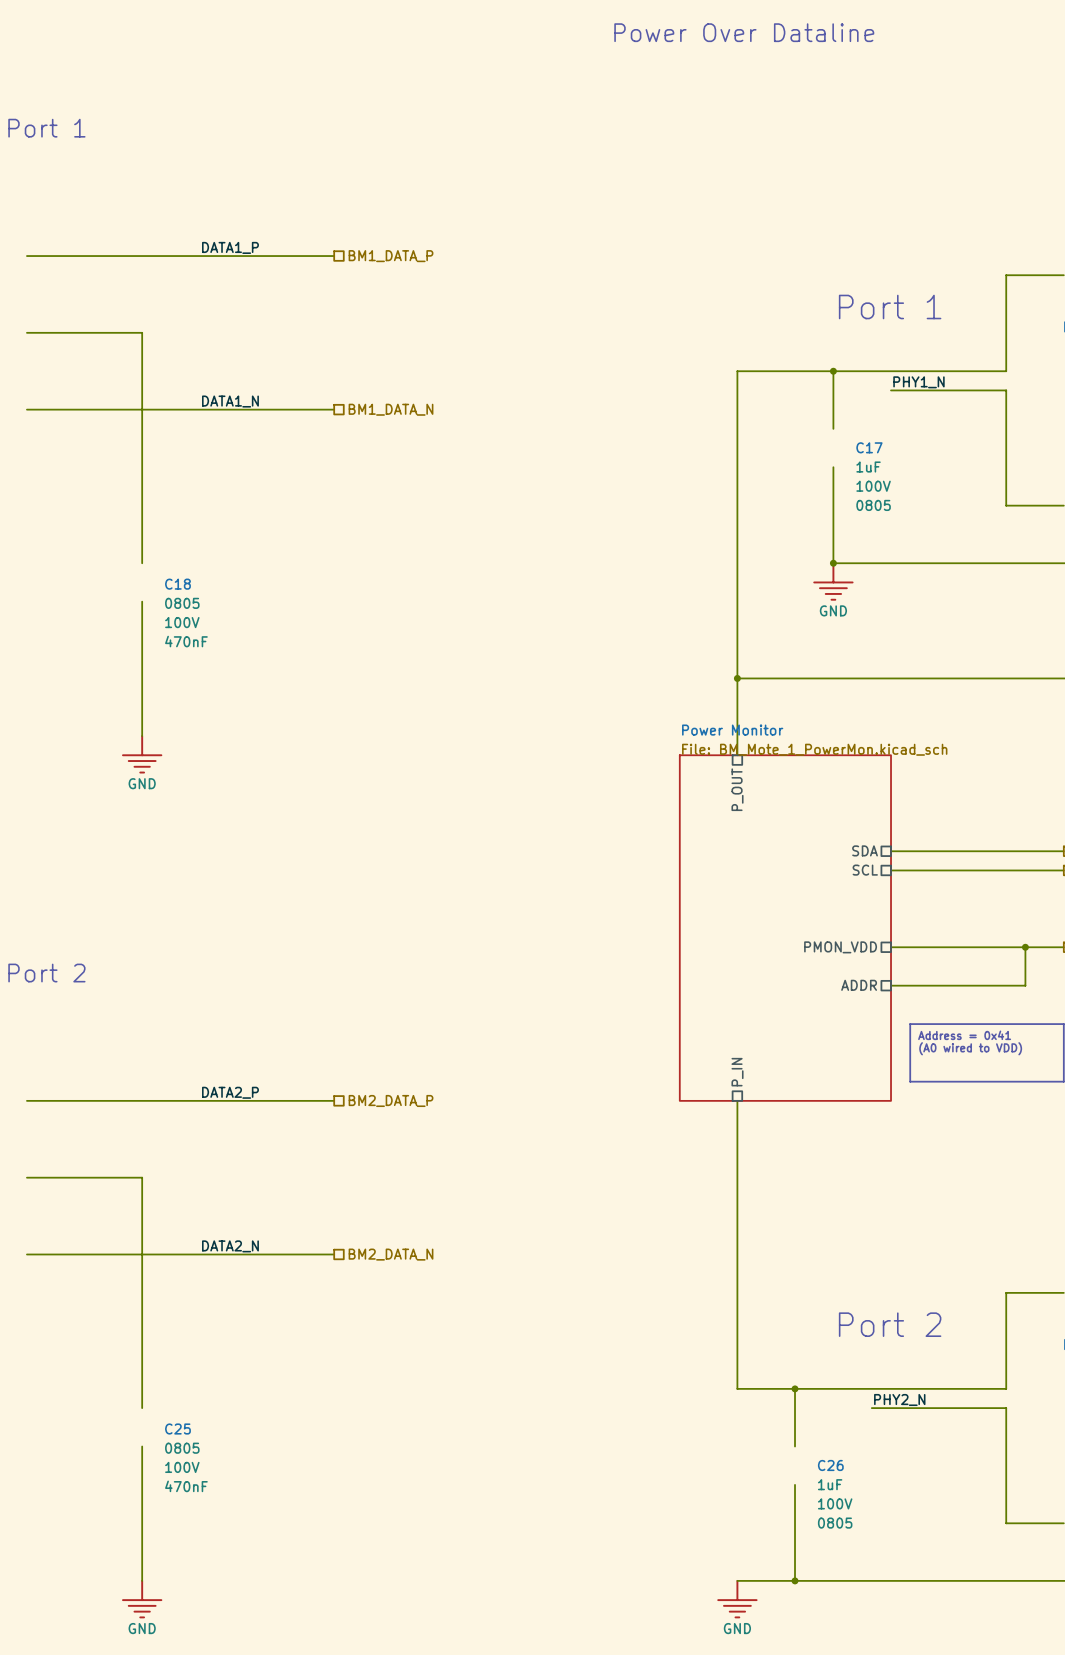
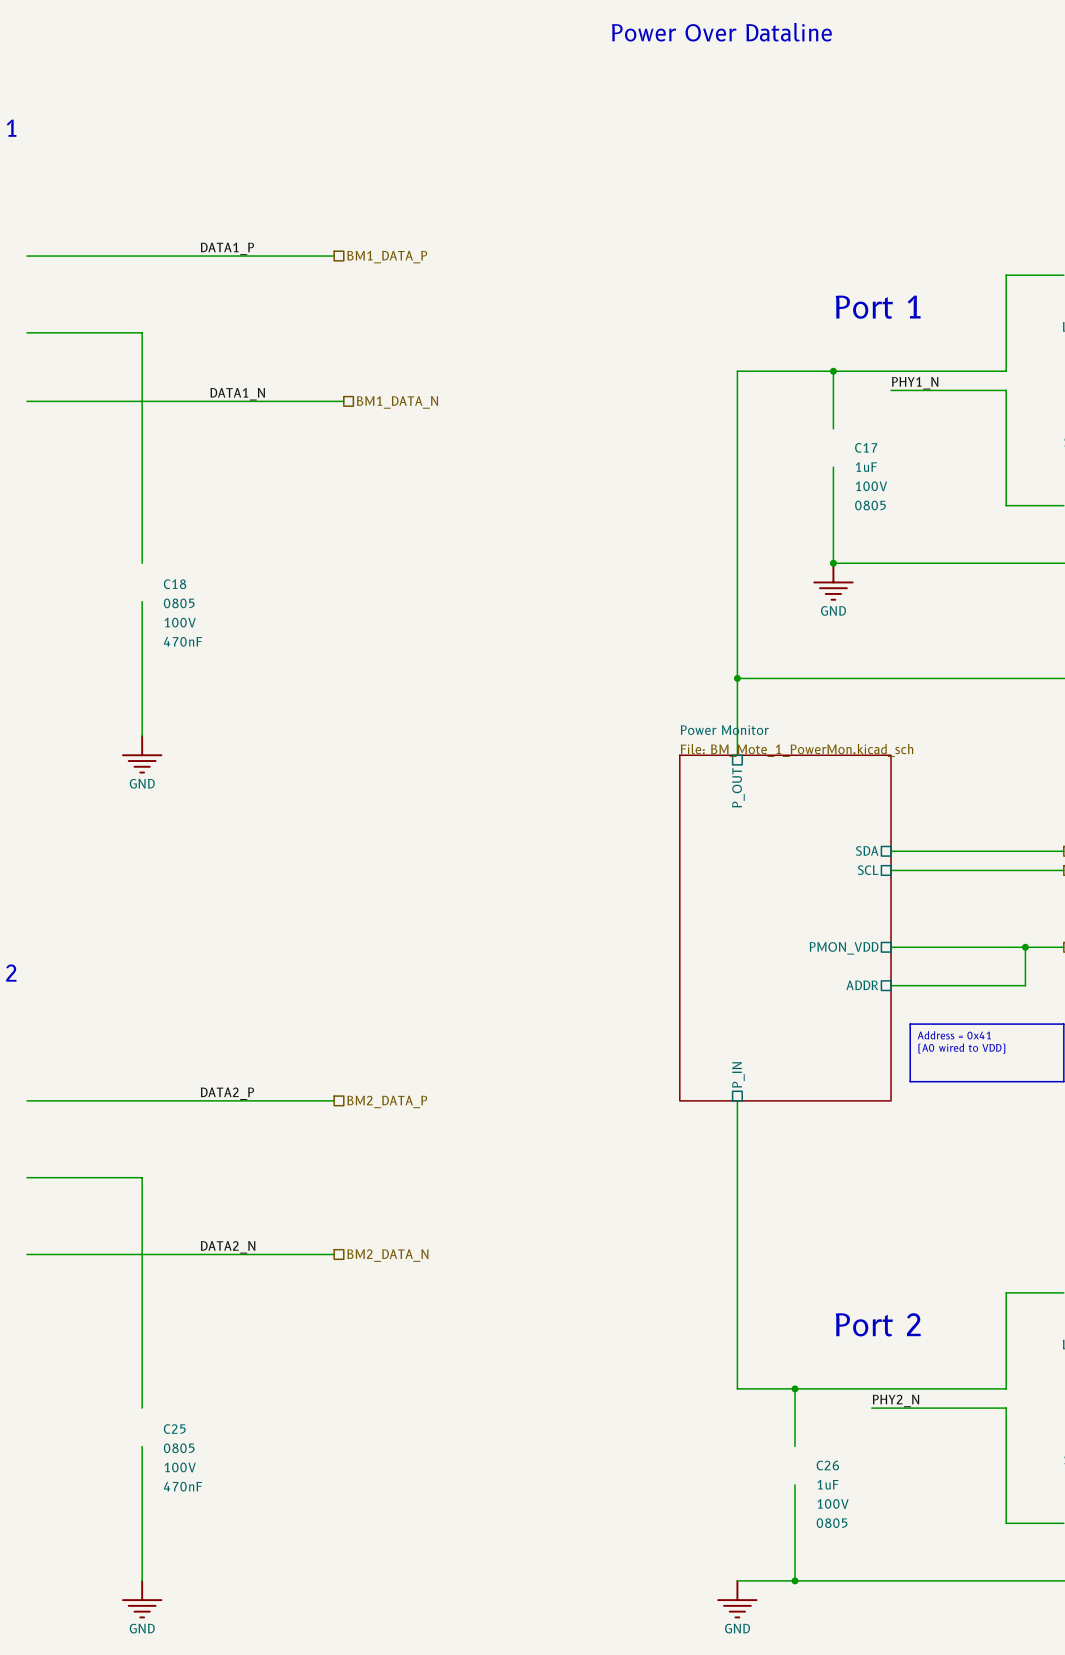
wire: none -> (26, 401) (343, 401)
label position: DATA1_N (230, 401) -> DATA1_N (237, 394)
wire: (26, 409) (334, 409) -> none
hierarchical label position: BM1_DATA_N (391, 409) -> BM1_DATA_N (397, 402)

